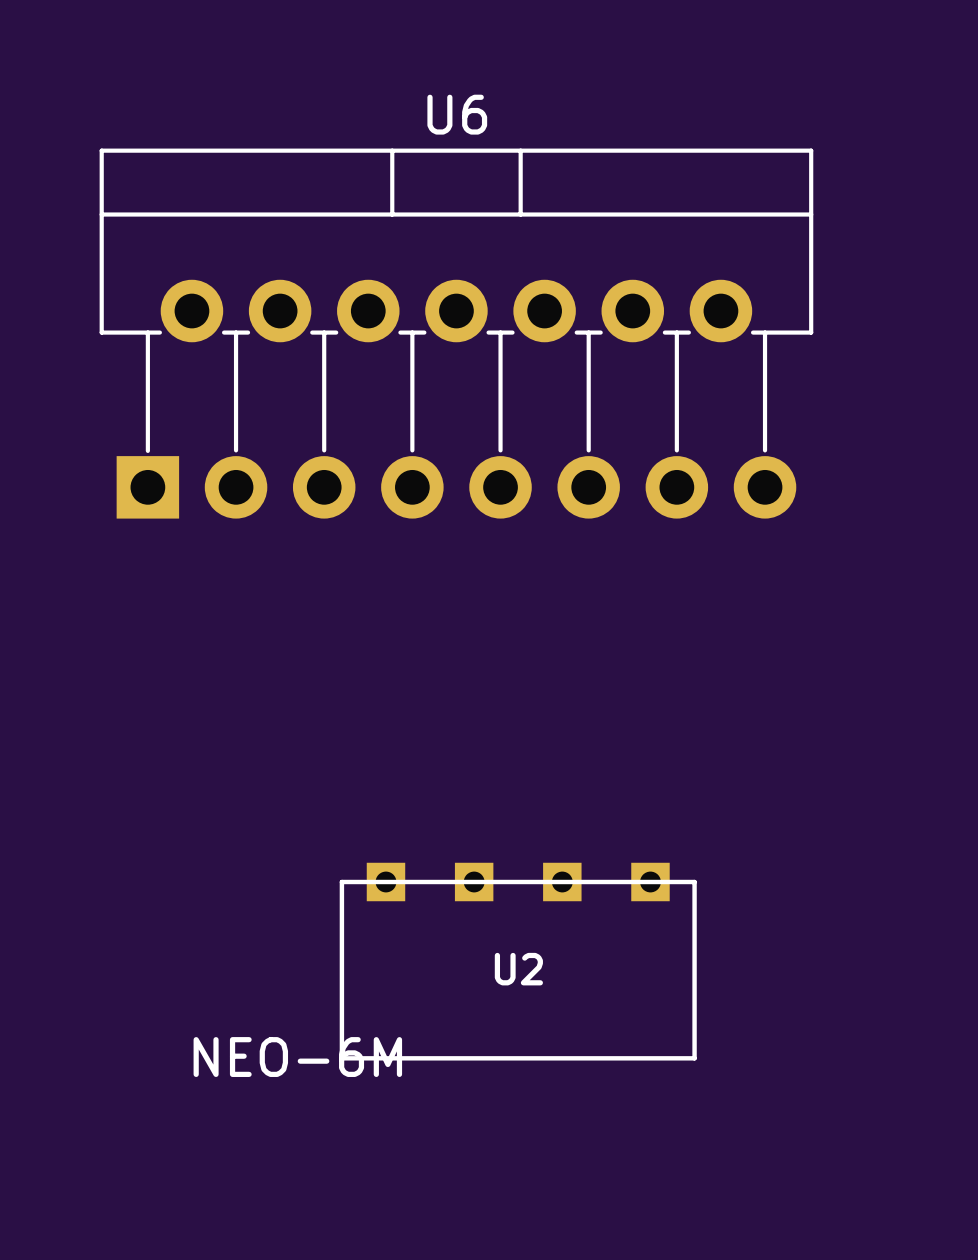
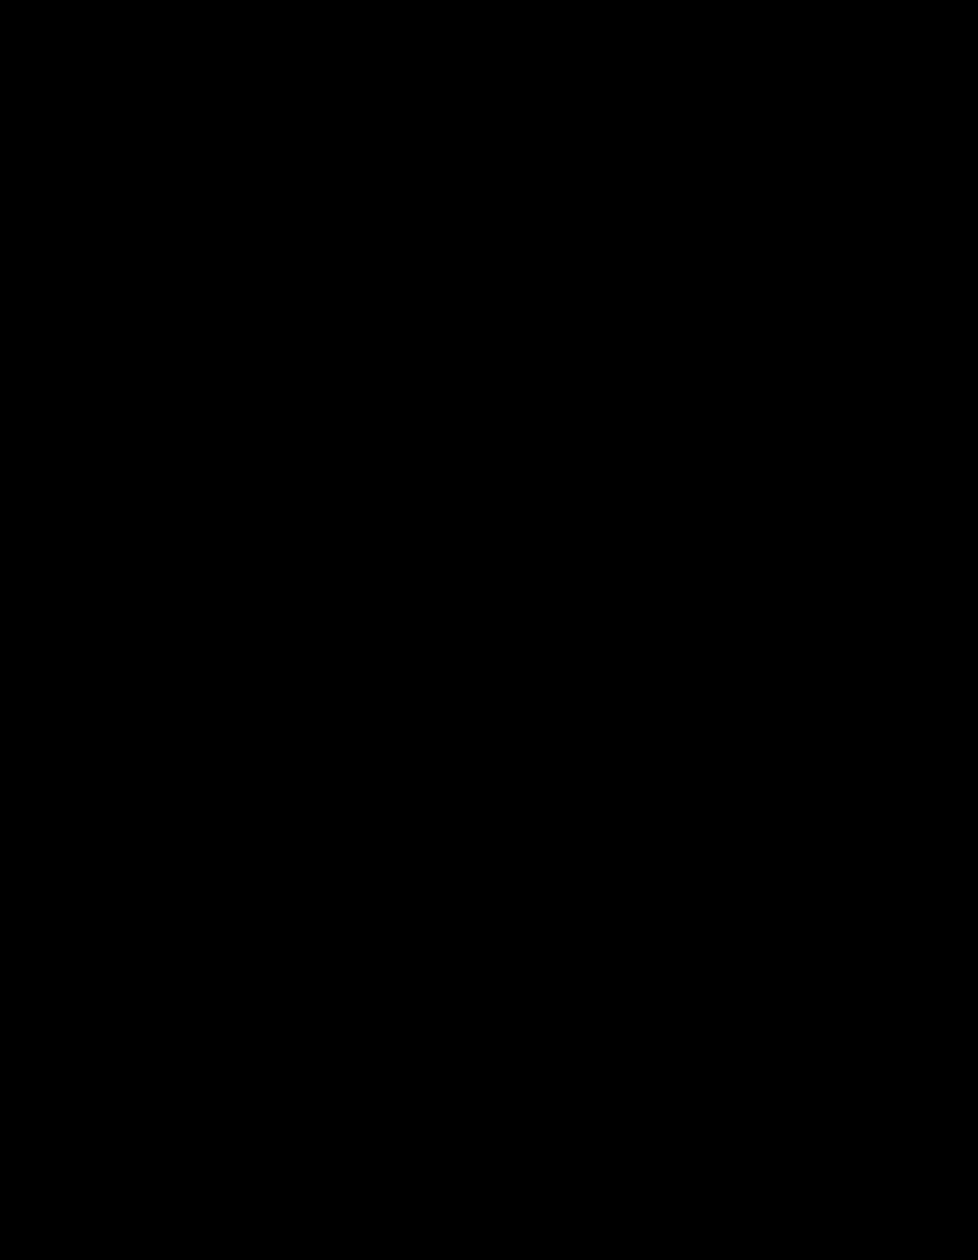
U6: (456, 333) -> none
U2: (518, 961) -> none

